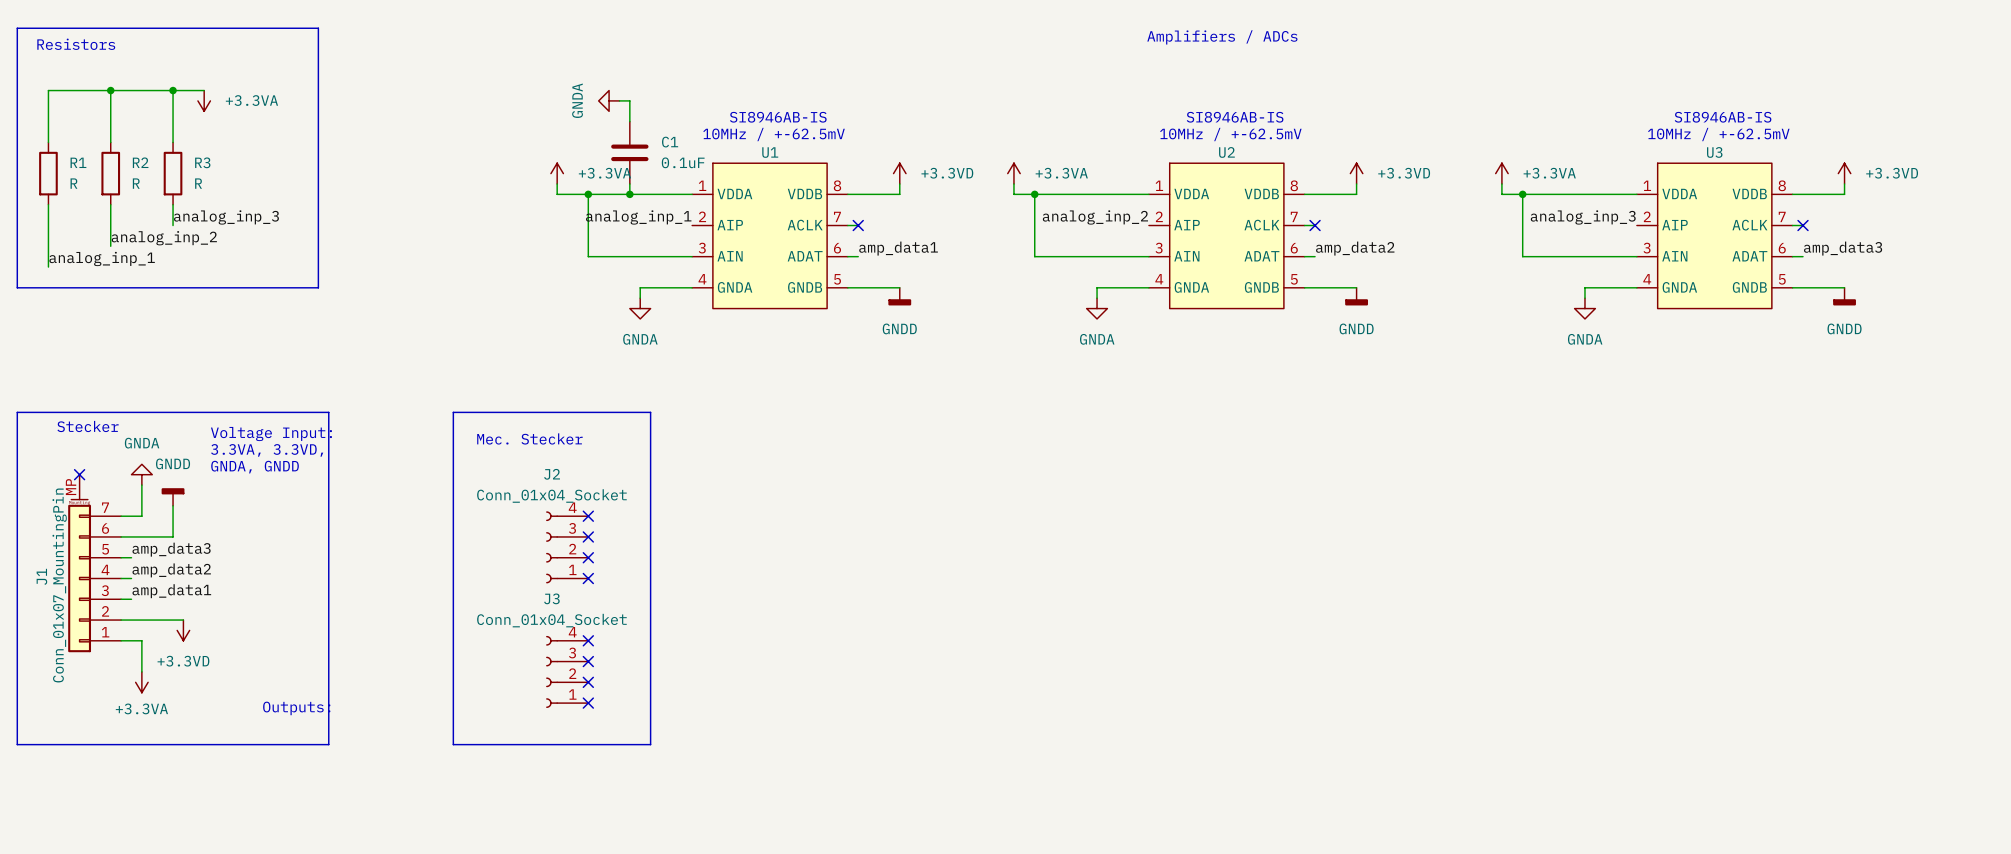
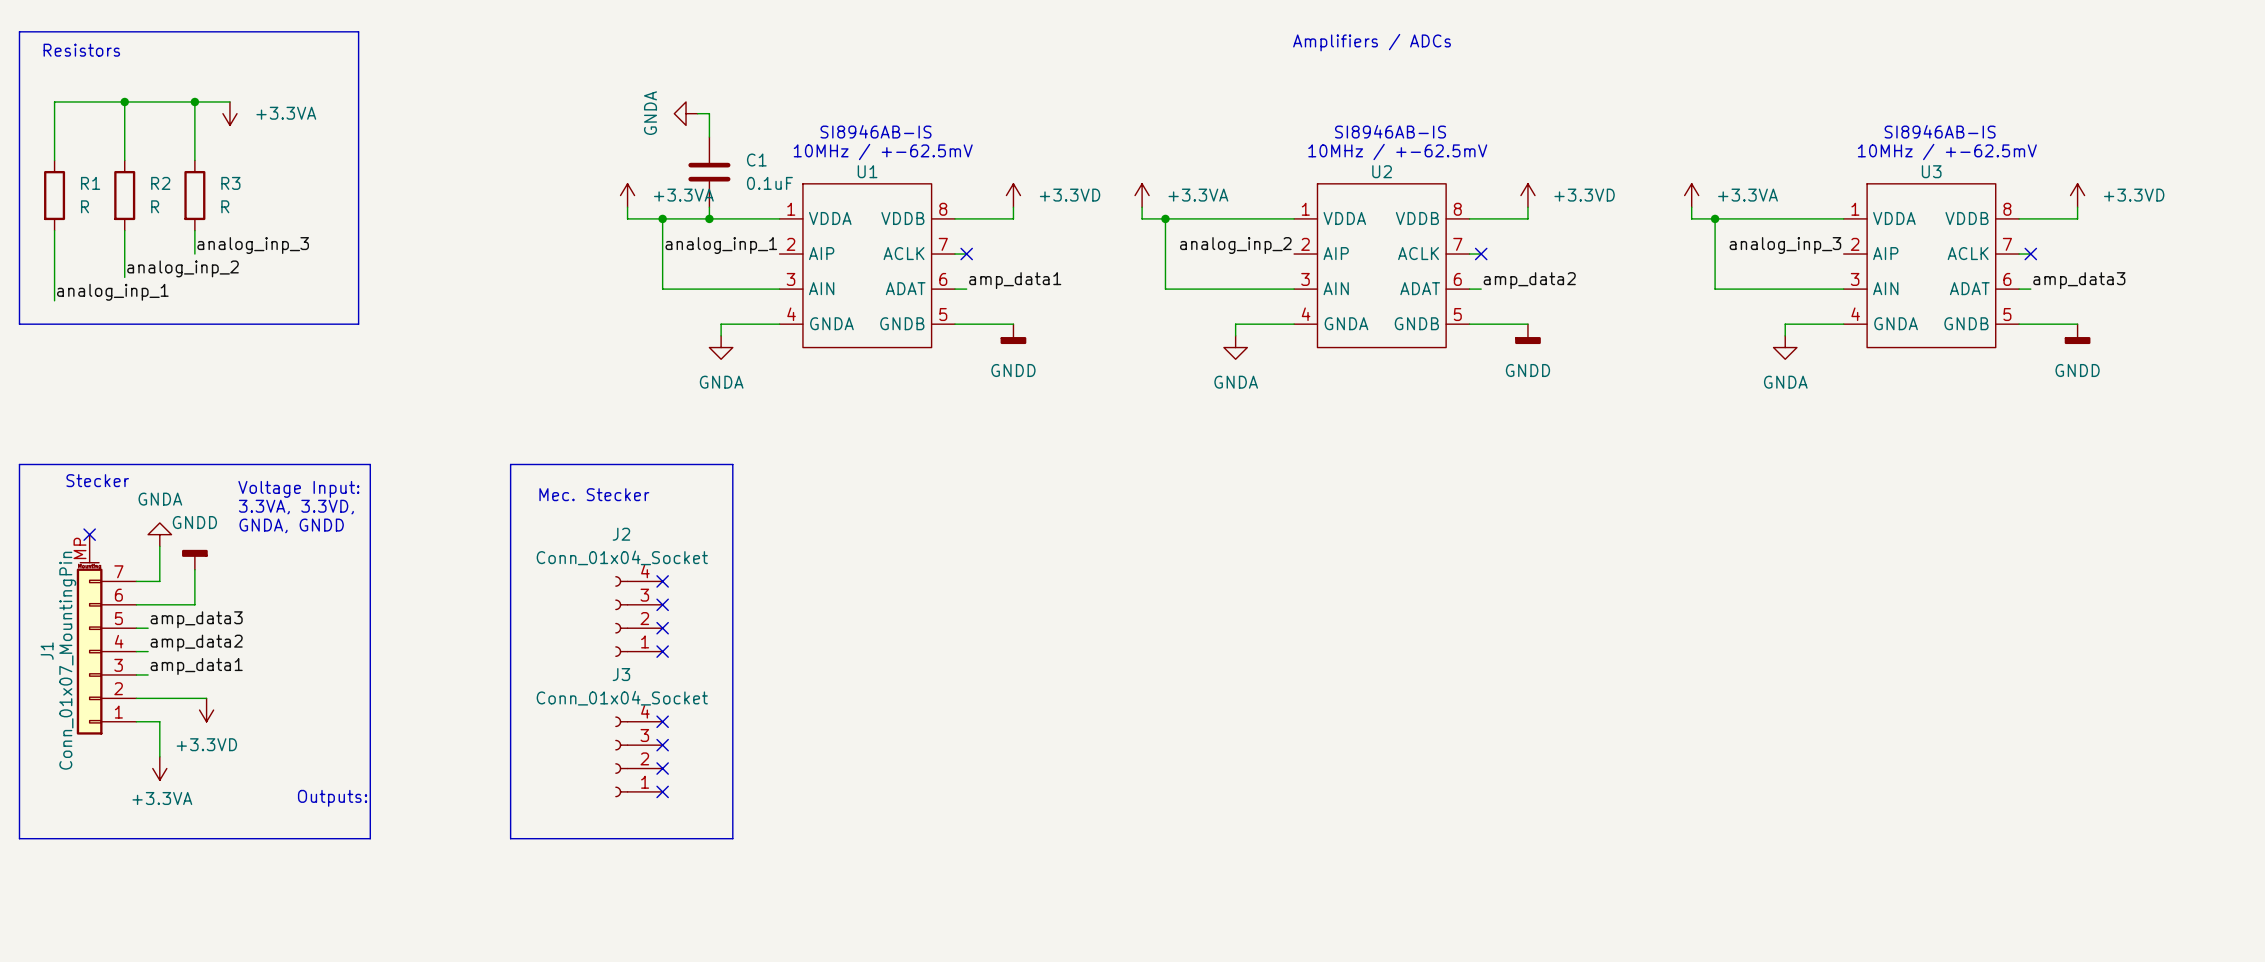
U1 symbol: [692, 163, 848, 309] -> [779, 183, 955, 348]
U2 symbol: [1148, 163, 1305, 309] -> [1294, 183, 1470, 348]
U3 symbol: [1636, 163, 1793, 309] -> [1843, 183, 2020, 348]

